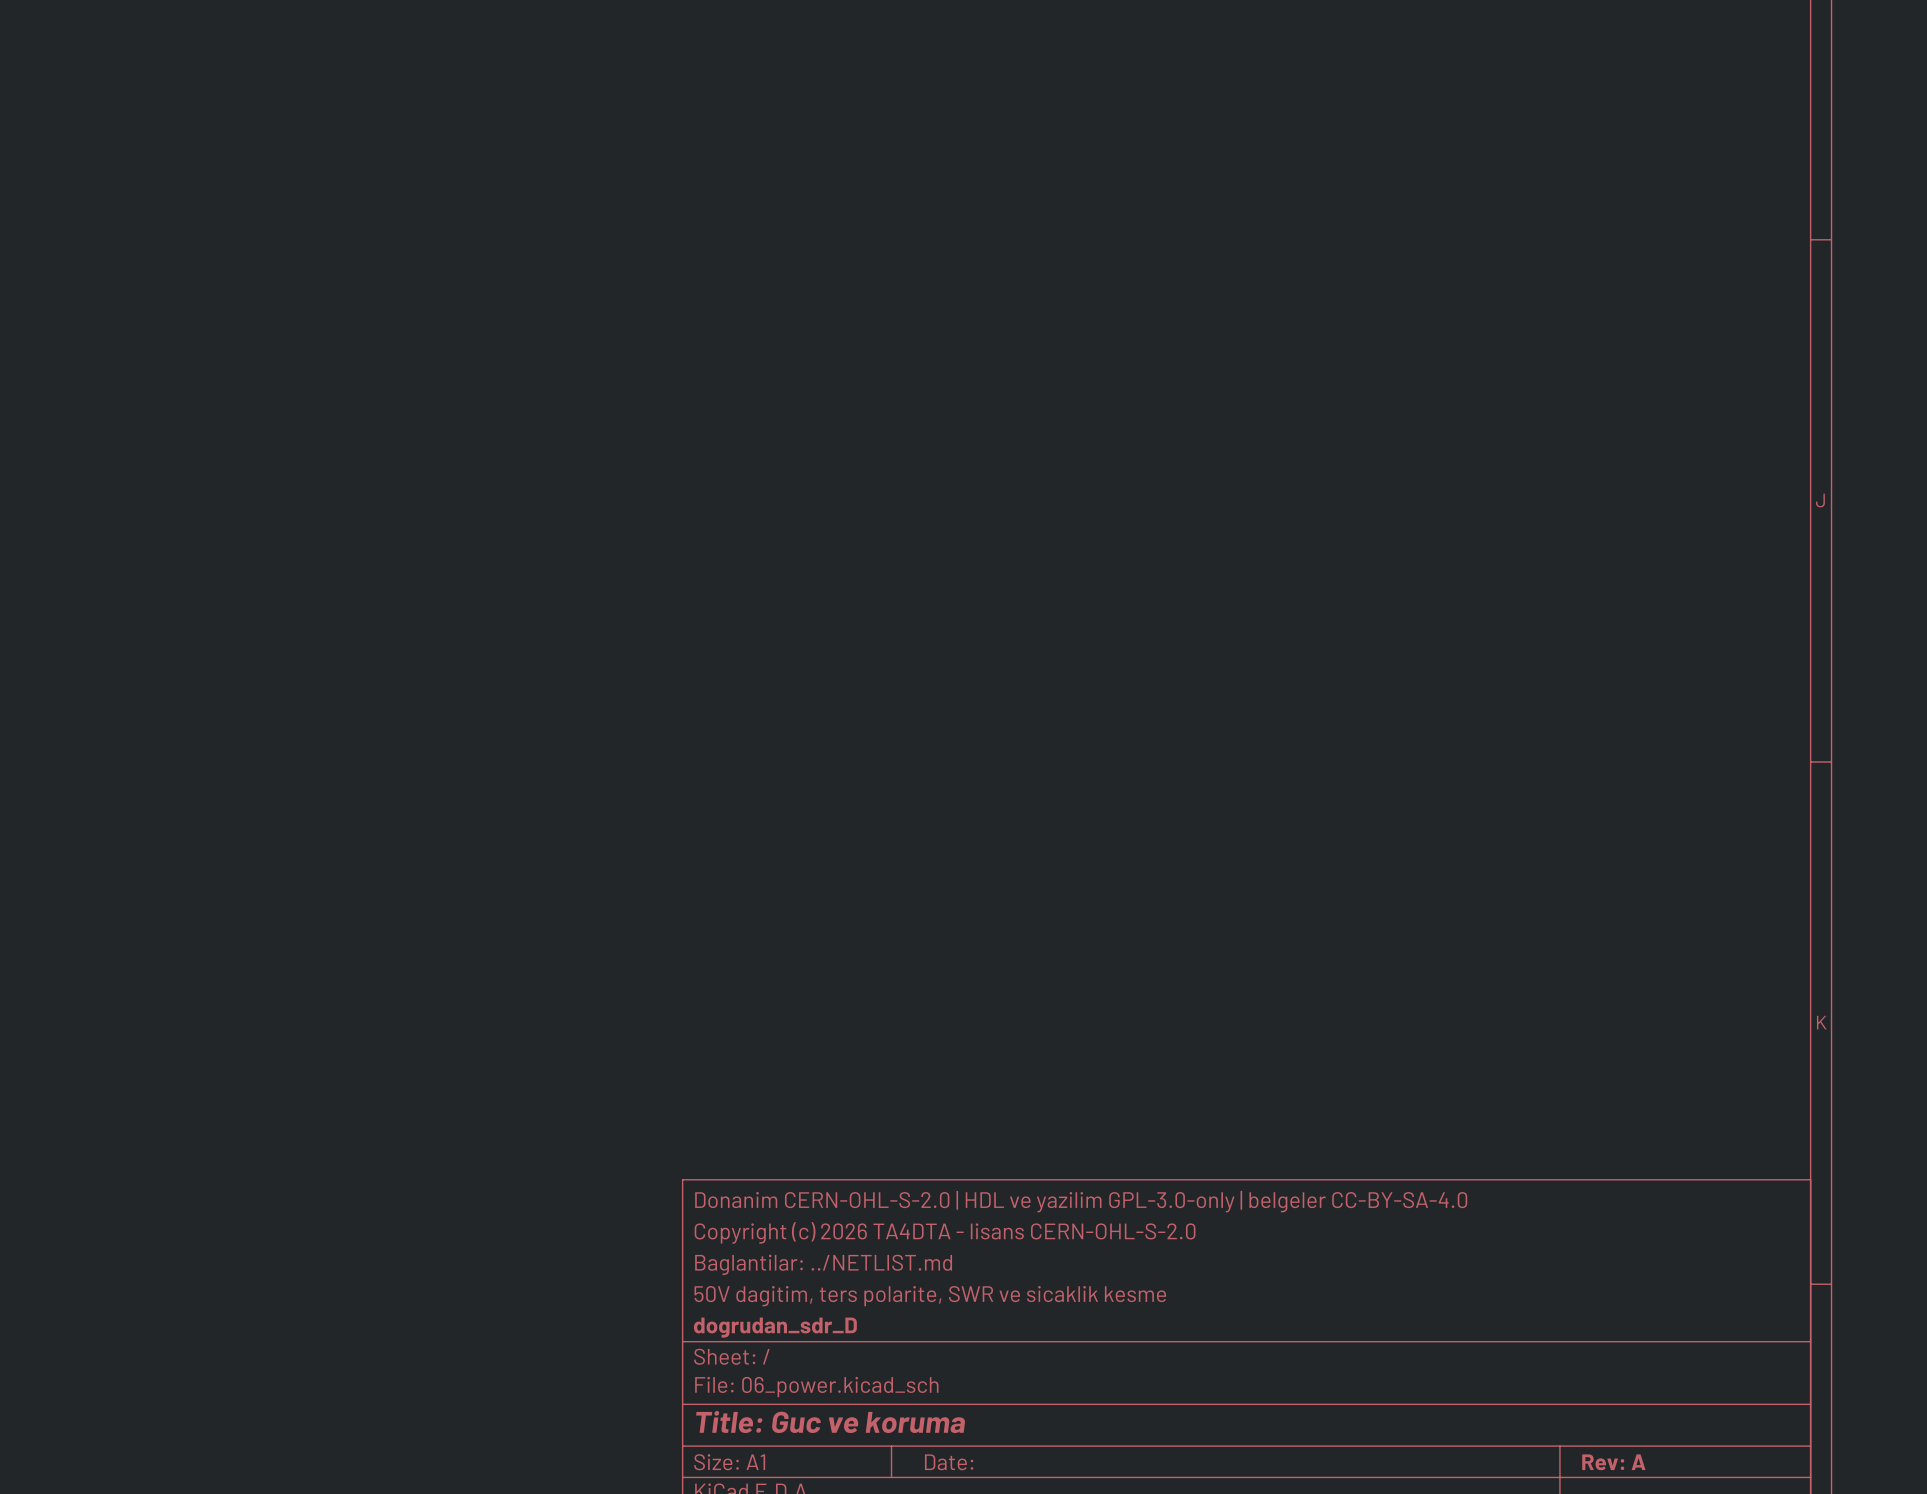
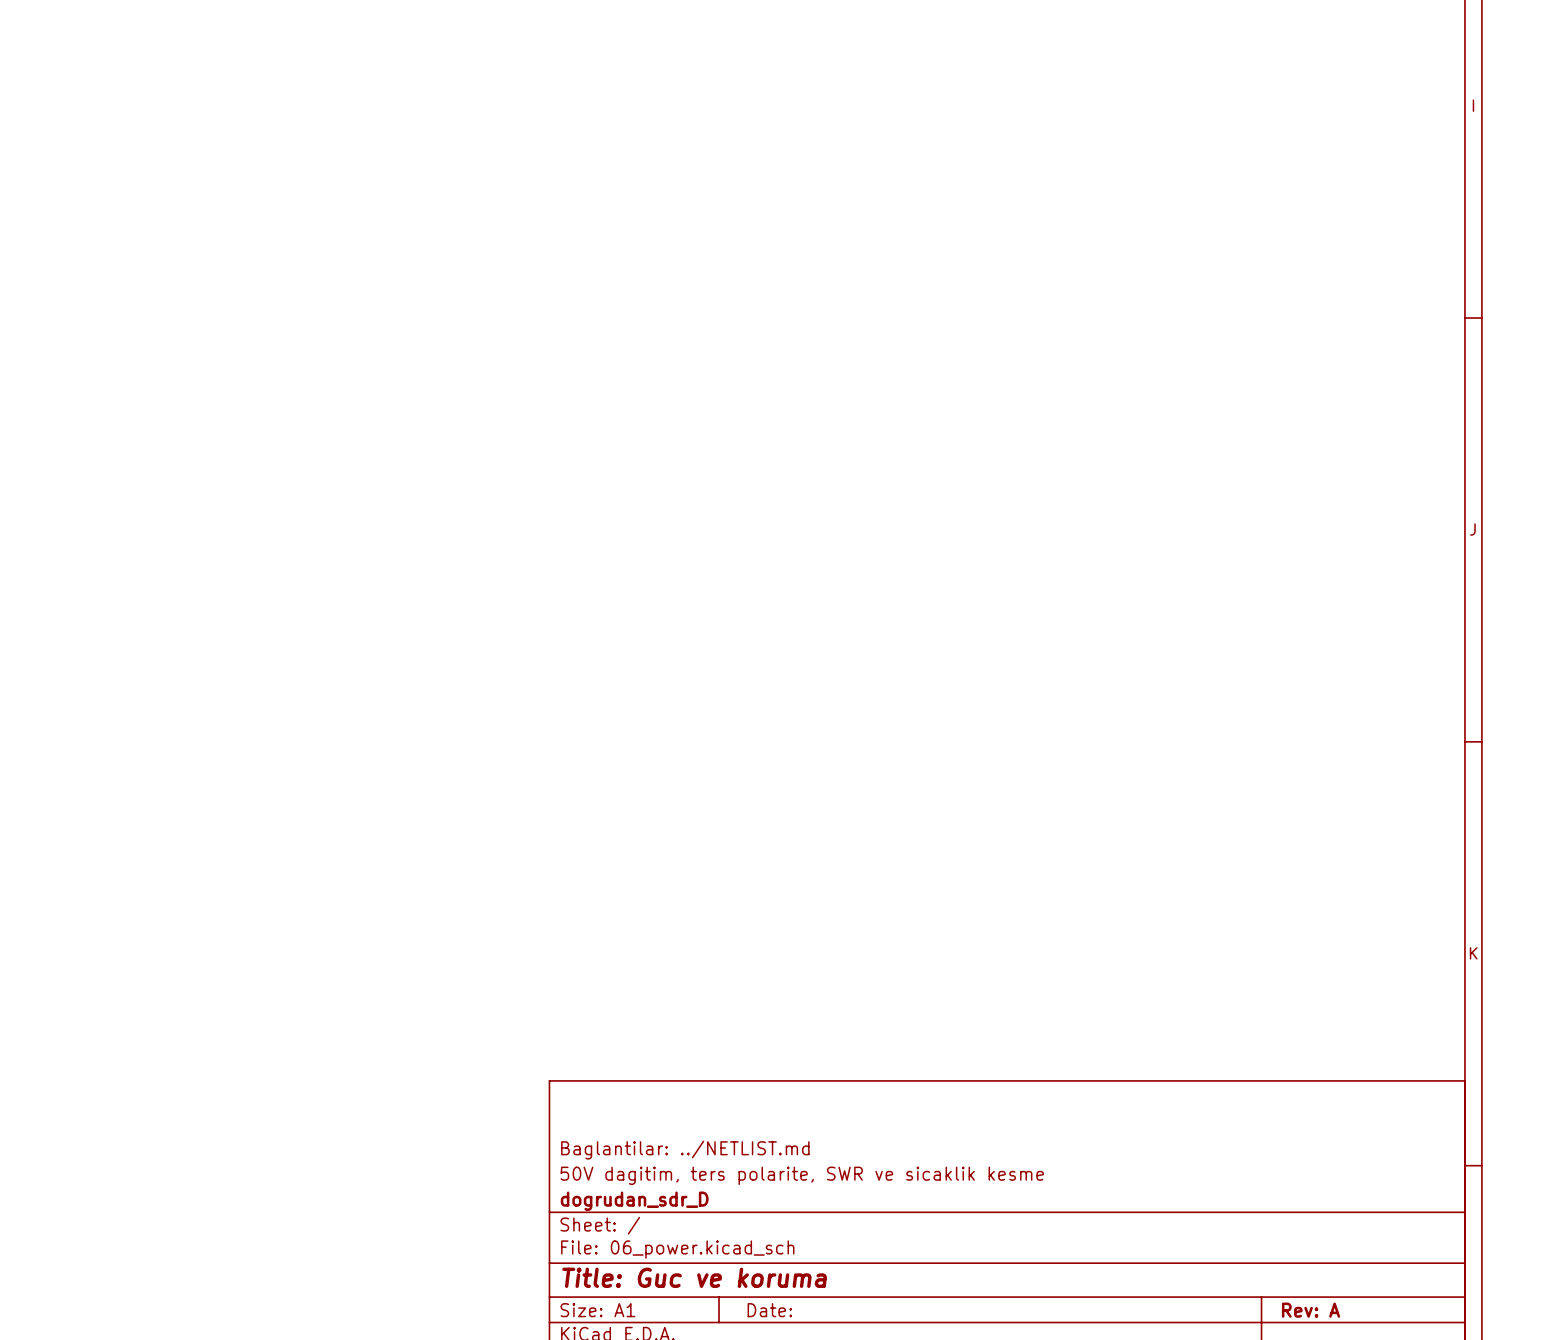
title block: Donanim CERN-OHL-S-2.0 | HDL ve yazilim GPL-3.0-only | belgeler CC-BY-SA-4.0 (1081, 1201) -> none
title block: Copyright (c) 2026 TA4DTA - lisans CERN-OHL-S-2.0 (945, 1232) -> none

